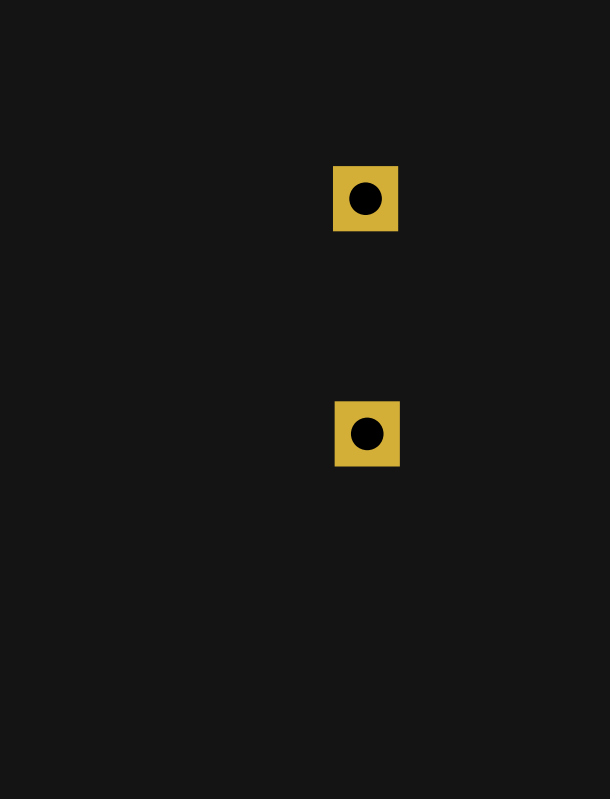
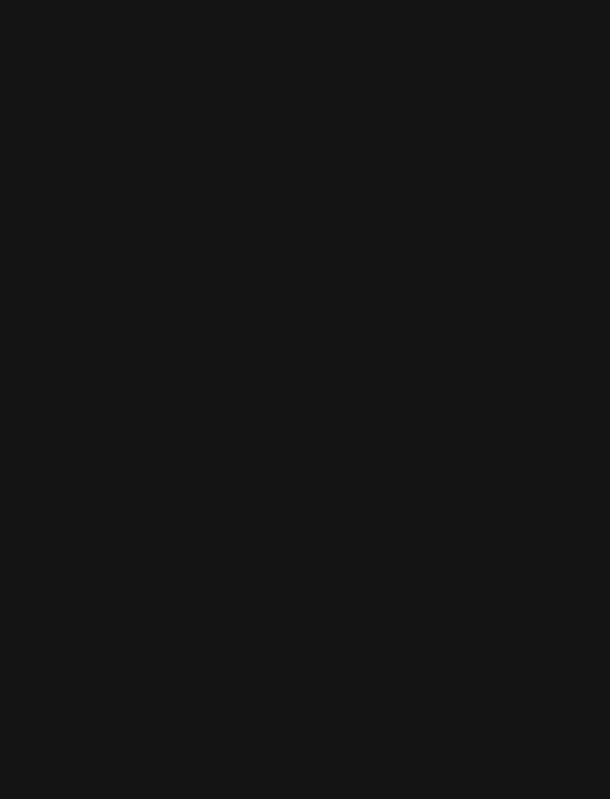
part: (365, 198) -> none
part: (367, 433) -> none

